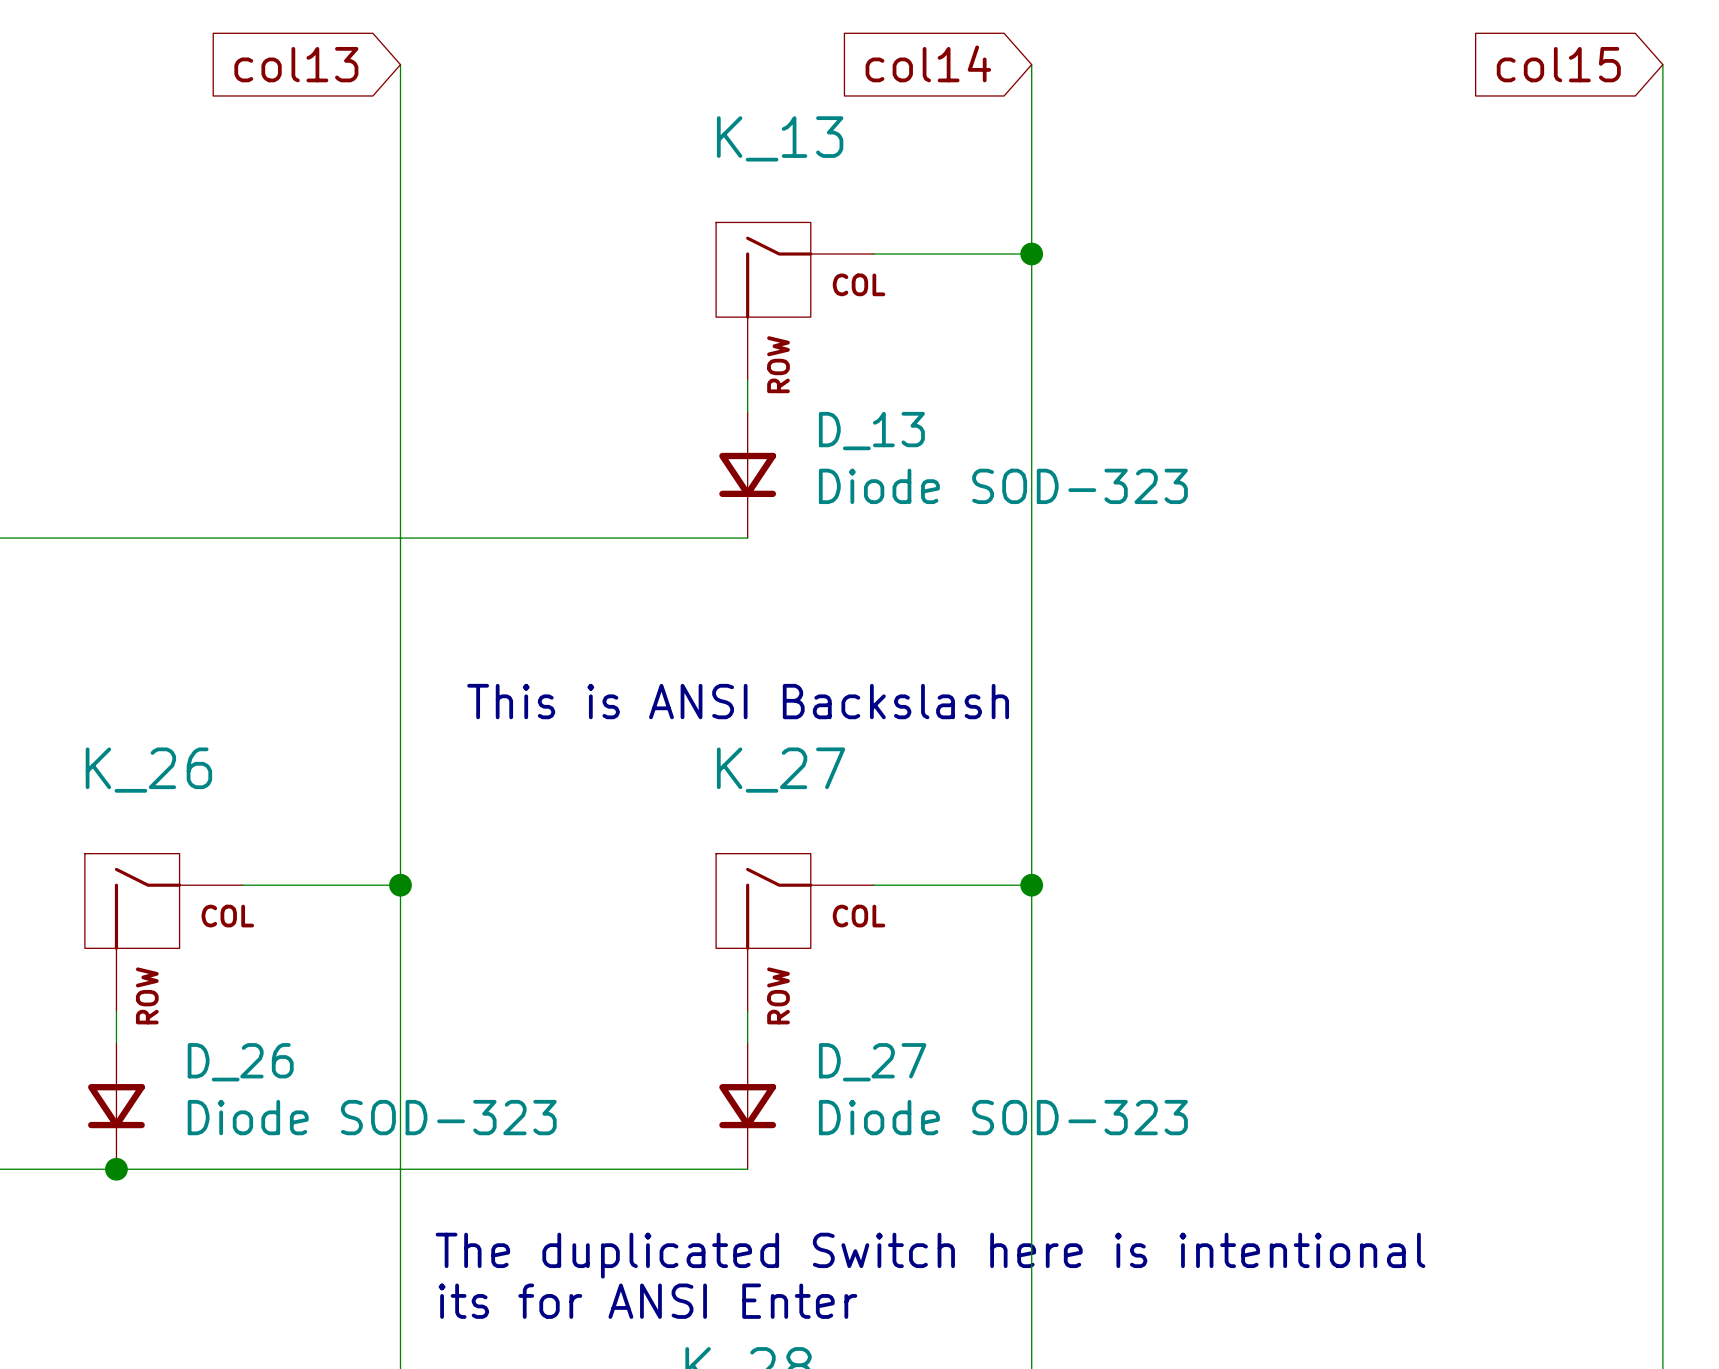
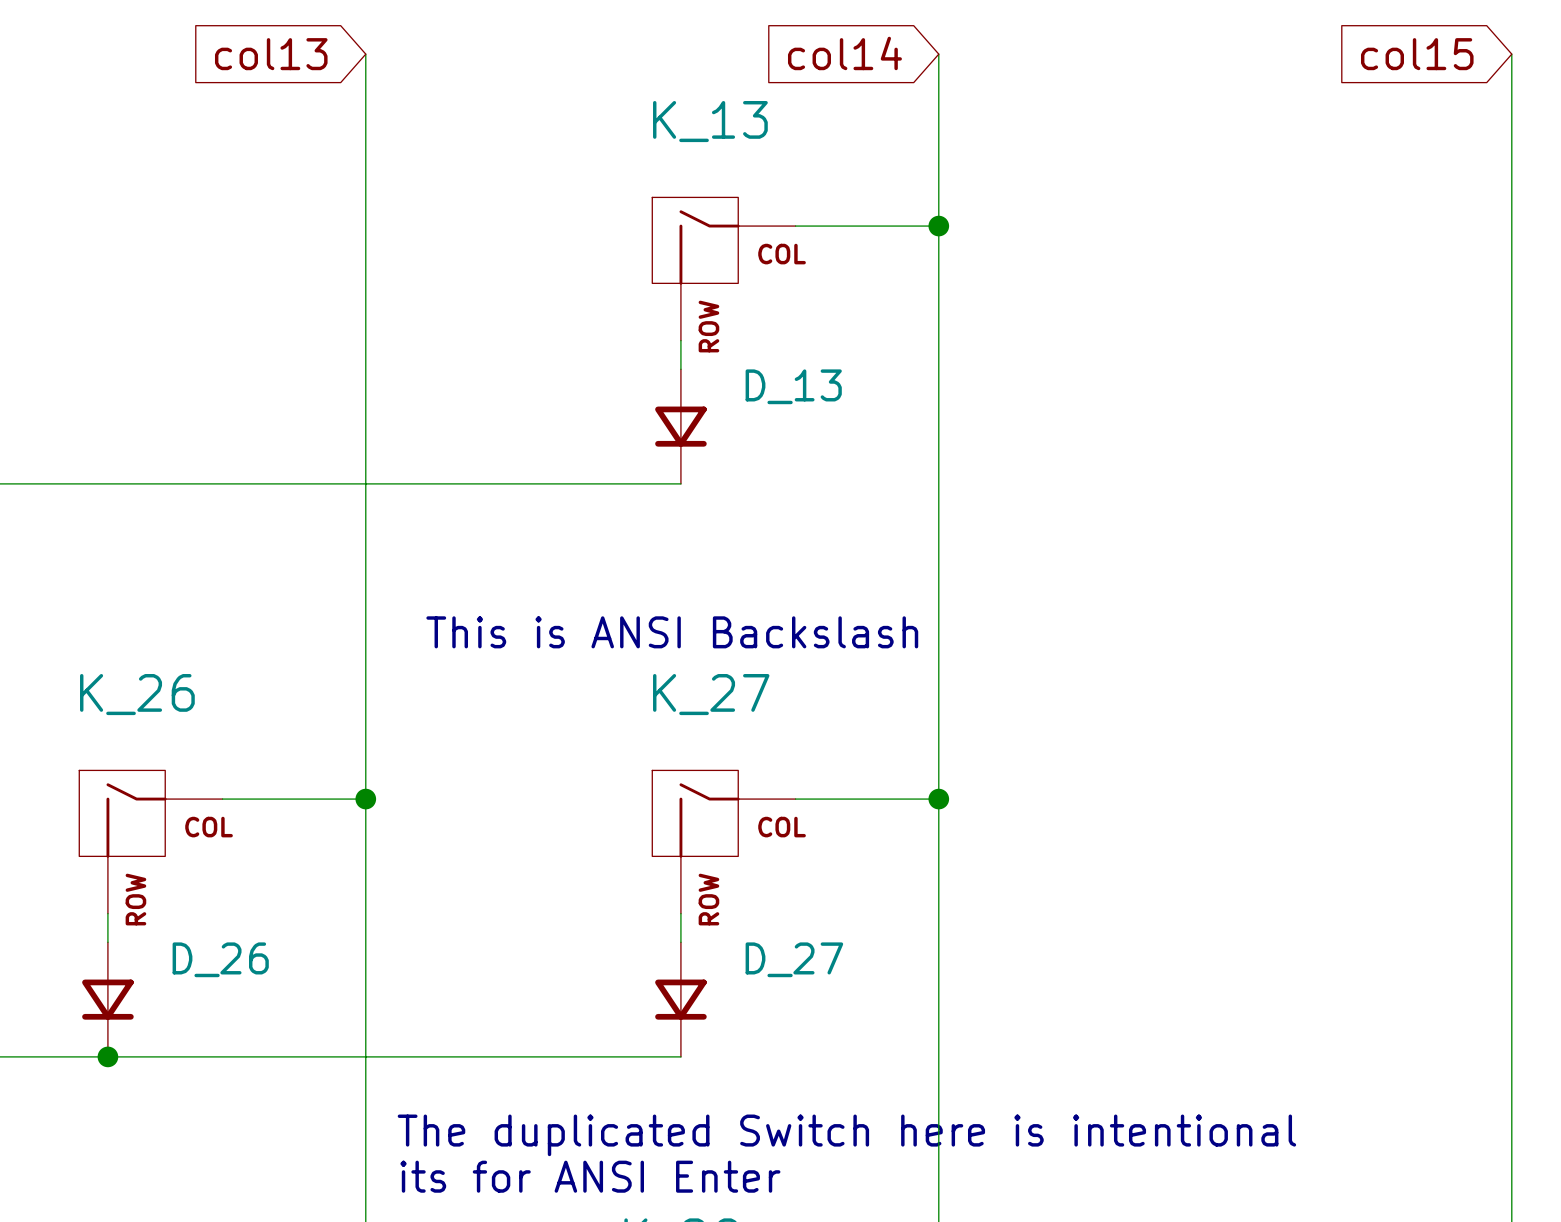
D_13 value: Diode SOD-323 (1003, 486) -> none
D_26 value: Diode SOD-323 (372, 1117) -> none
D_27 value: Diode SOD-323 (1003, 1117) -> none

